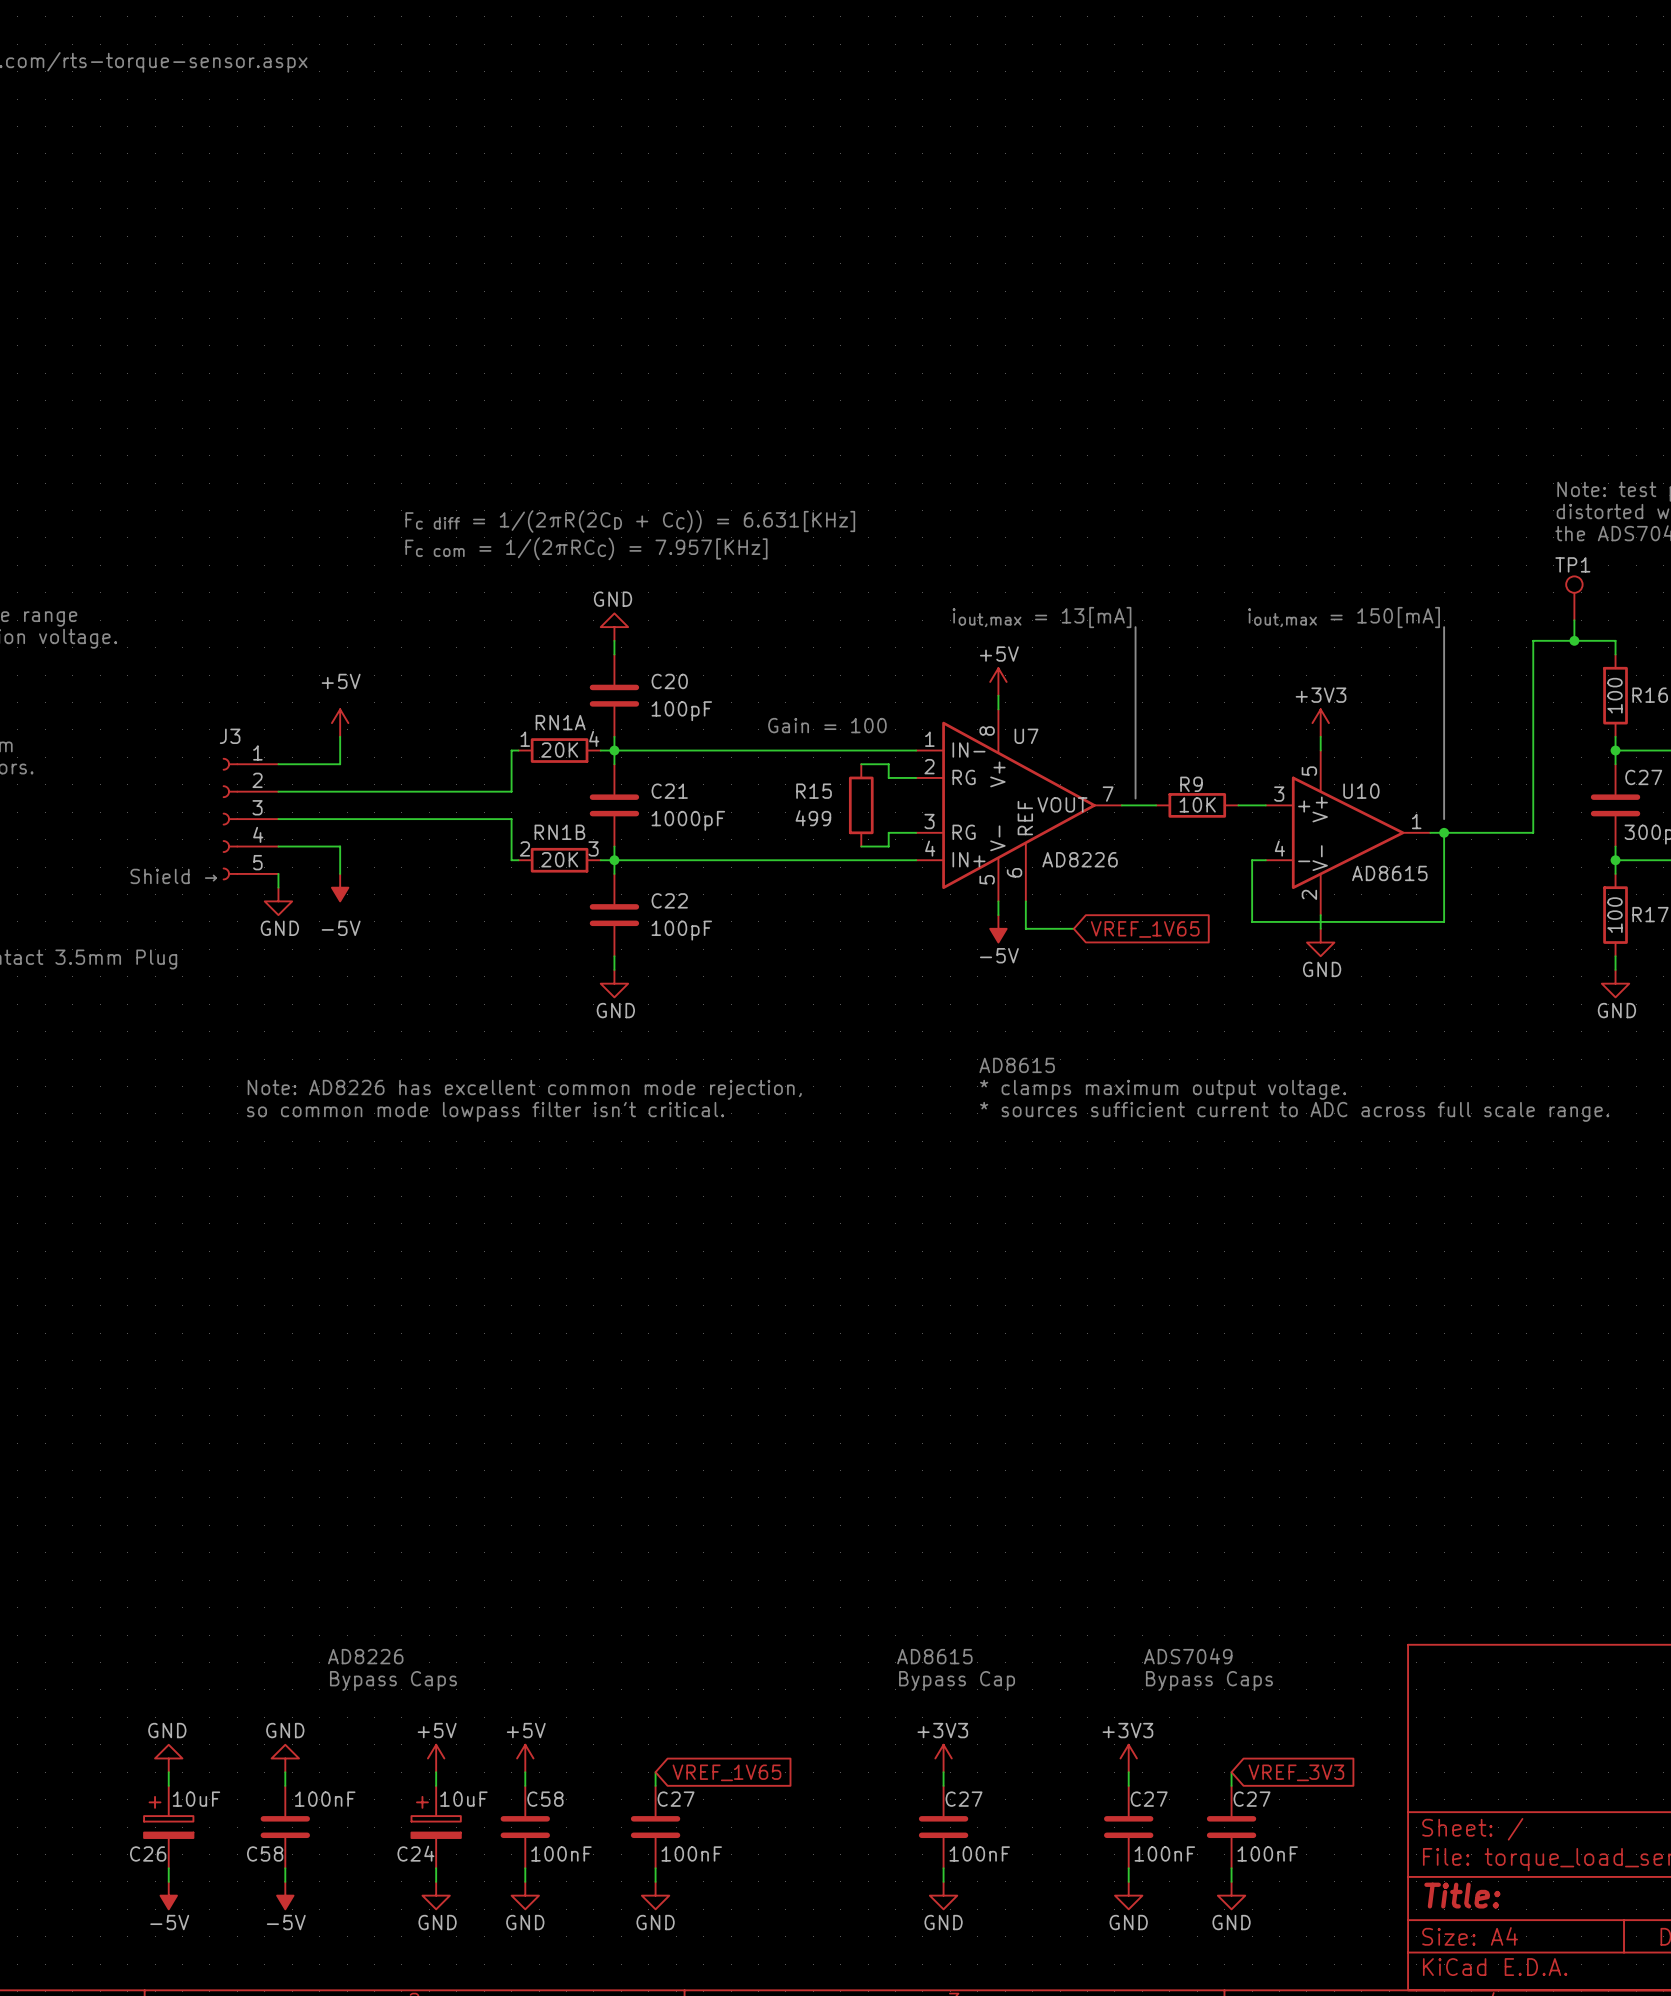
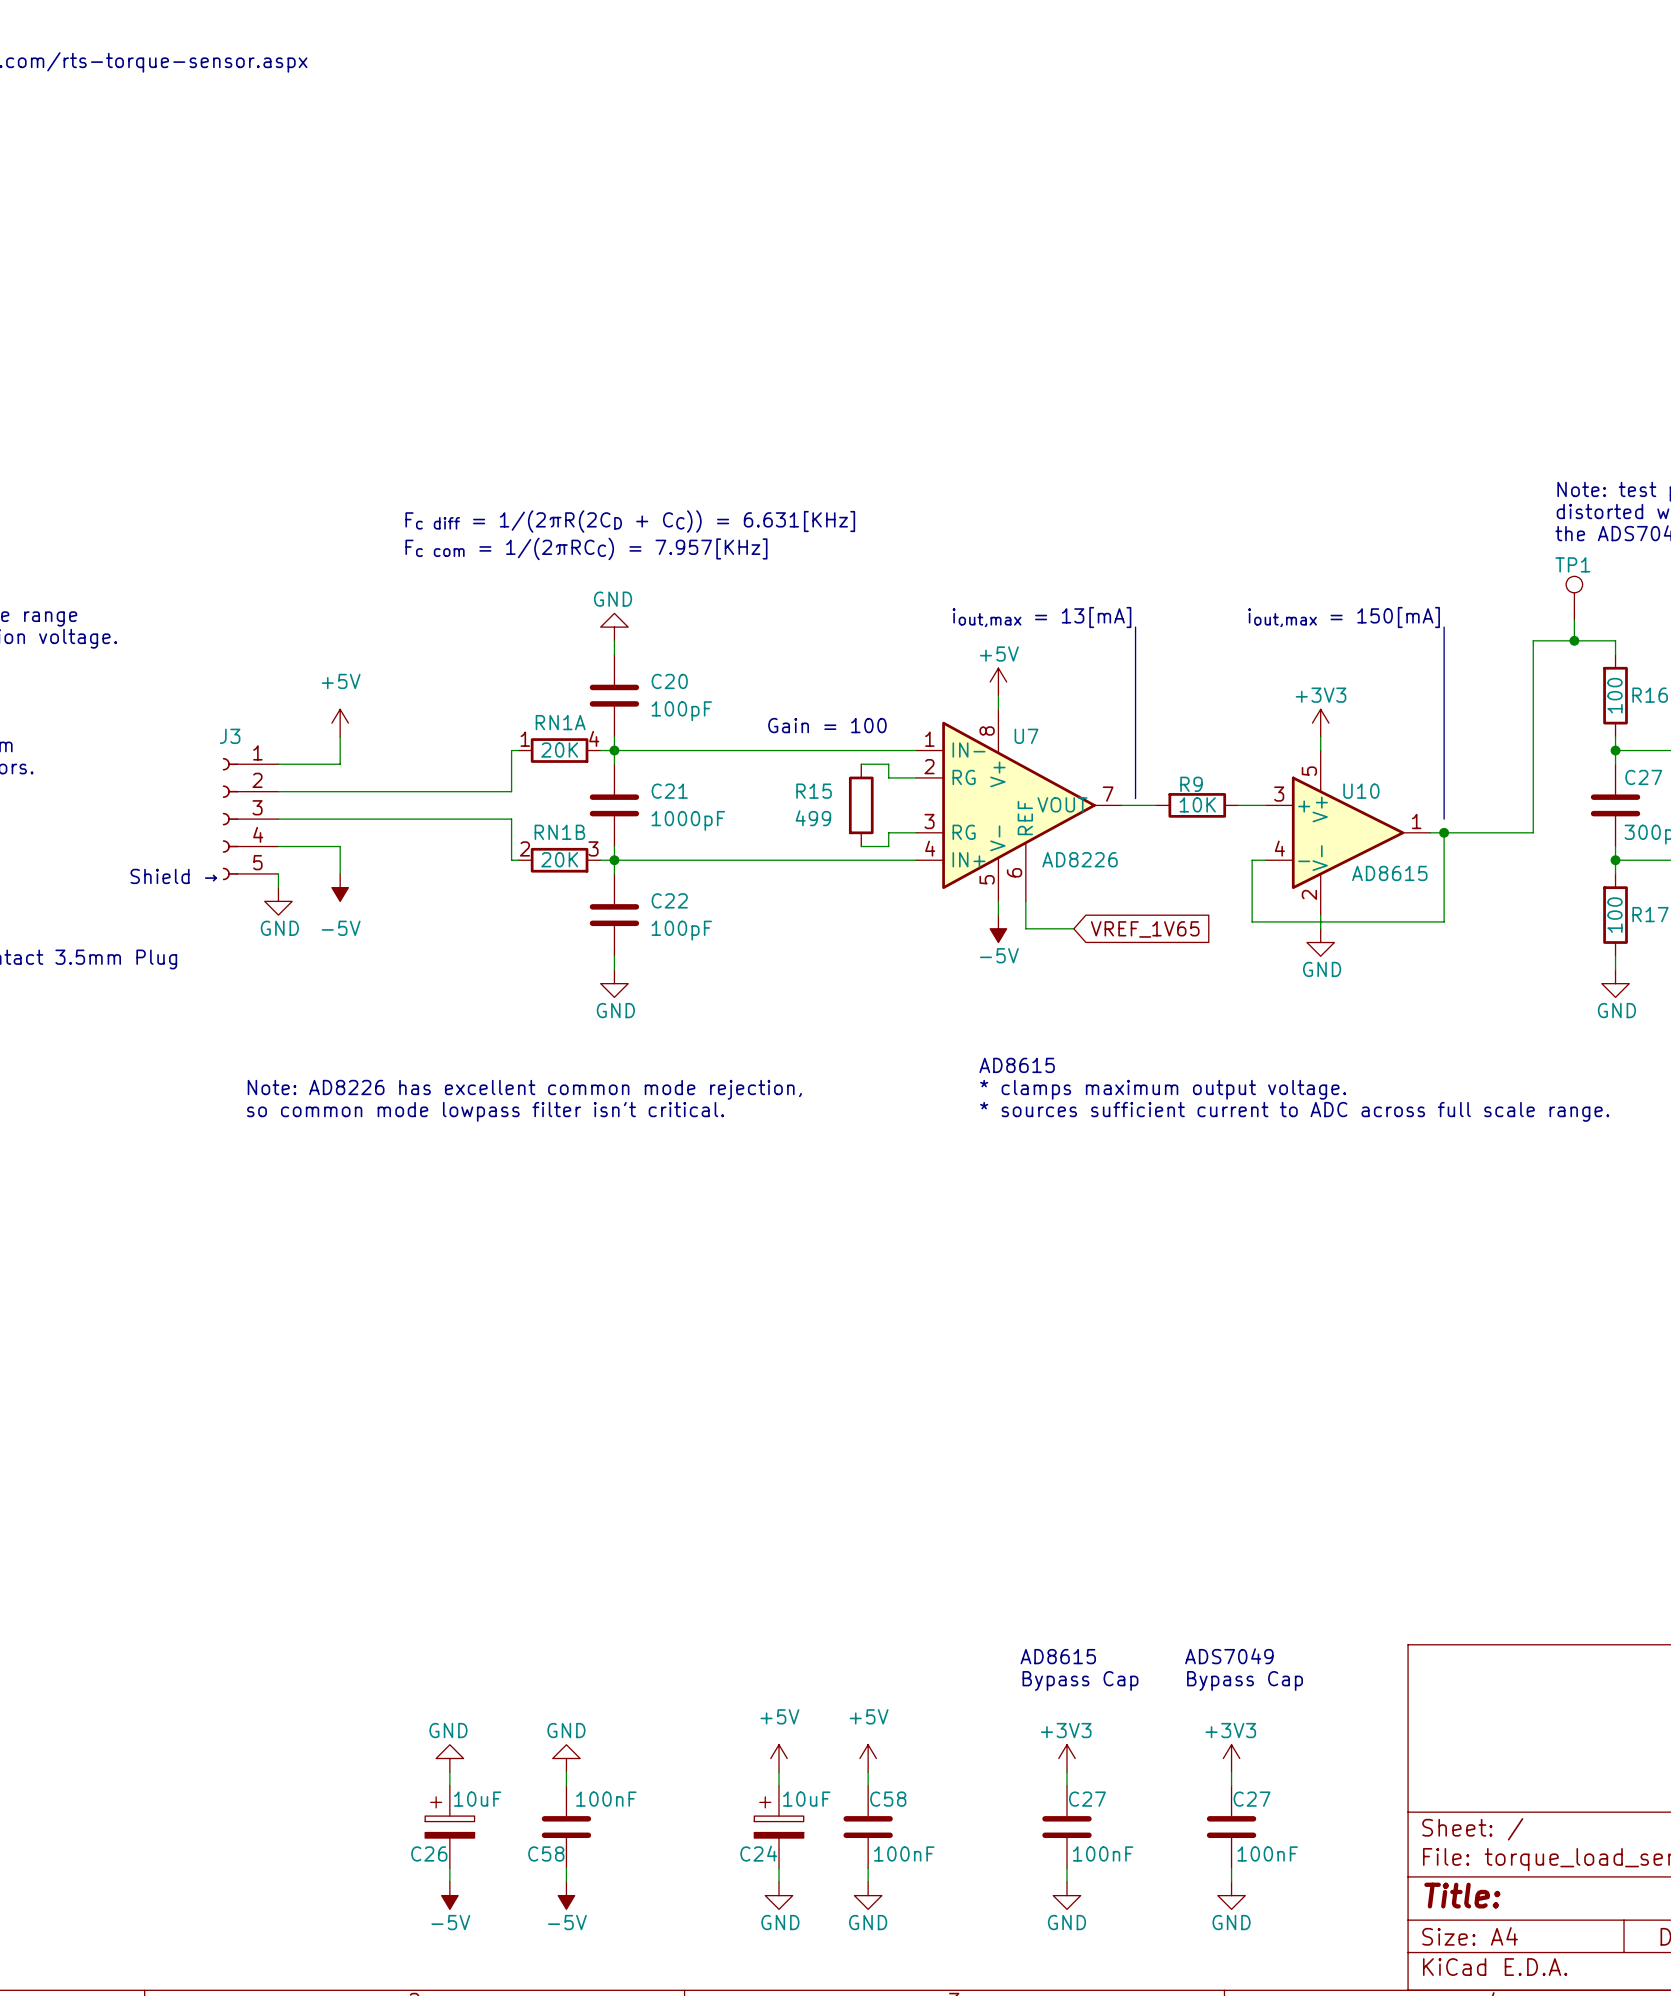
text: AD8226 (365, 1656) -> none
text position: AD8615 (934, 1656) -> AD8615 (1058, 1656)
text position: ADS7049 (1188, 1656) -> ADS7049 (1229, 1656)
text: Bypass Caps (393, 1680) -> none
text position: Bypass Cap (957, 1680) -> Bypass Cap (1080, 1680)
text: Bypass Caps (1209, 1680) -> Bypass Cap (1245, 1680)
power symbol: GND (168, 1758) -> none
power symbol: GND (285, 1758) -> none
power symbol: +5V (436, 1758) -> none
power symbol: none -> GND (449, 1758)
power symbol: +5V (525, 1758) -> none
power symbol: none -> GND (566, 1758)
power symbol: none -> +5V (779, 1758)
power symbol: none -> +5V (868, 1758)
power symbol: +3V3 (943, 1758) -> none
power symbol: none -> +3V3 (1066, 1758)
power symbol: +3V3 (1128, 1758) -> none
power symbol: none -> +3V3 (1231, 1758)
wire: (168, 1772) (168, 1785) -> none
wire: (285, 1772) (285, 1785) -> none
wire: (436, 1772) (436, 1785) -> (566, 1772) (566, 1785)
wire: (525, 1772) (525, 1785) -> (449, 1772) (449, 1785)
wire: (655, 1772) (655, 1785) -> (779, 1772) (779, 1785)
global label: VREF_1V65 (726, 1772) -> none
wire: (943, 1772) (943, 1785) -> (868, 1772) (868, 1785)
wire: (1128, 1772) (1128, 1785) -> (1066, 1772) (1066, 1785)
global label: VREF_3V3 (1296, 1772) -> none
C58 name position: C58 (545, 1799) -> C58 (546, 1853)
C26 position: (168, 1827) -> (449, 1827)
C58: 100nF (285, 1827) -> none
C24 position: (436, 1827) -> (779, 1827)
C58 position: (525, 1827) -> (566, 1827)
C27: 100nF (655, 1827) -> none
C58: none -> 100nF (868, 1827)
C27: 100nF (943, 1827) -> none
C27: none -> 100nF (1066, 1827)
C27: 100nF (1128, 1827) -> none
C58 value position: 100nF (561, 1853) -> 100nF (606, 1799)
wire: (168, 1868) (168, 1881) -> none
wire: (285, 1868) (285, 1881) -> none
wire: (436, 1868) (436, 1881) -> (566, 1868) (566, 1881)
wire: (525, 1868) (525, 1881) -> (449, 1868) (449, 1881)
wire: (655, 1868) (655, 1881) -> (779, 1868) (779, 1881)
wire: (943, 1868) (943, 1881) -> (868, 1868) (868, 1881)
wire: (1128, 1868) (1128, 1881) -> (1066, 1868) (1066, 1881)
power symbol: -5V (168, 1895) -> none
power symbol: -5V (285, 1895) -> none
power symbol: GND (436, 1895) -> none
power symbol: none -> -5V (449, 1895)
power symbol: GND (525, 1895) -> none
power symbol: none -> -5V (566, 1895)
power symbol: GND (655, 1895) -> none
power symbol: none -> GND (779, 1895)
power symbol: none -> GND (868, 1895)
power symbol: GND (943, 1895) -> none
power symbol: none -> GND (1066, 1895)
power symbol: GND (1128, 1895) -> none

